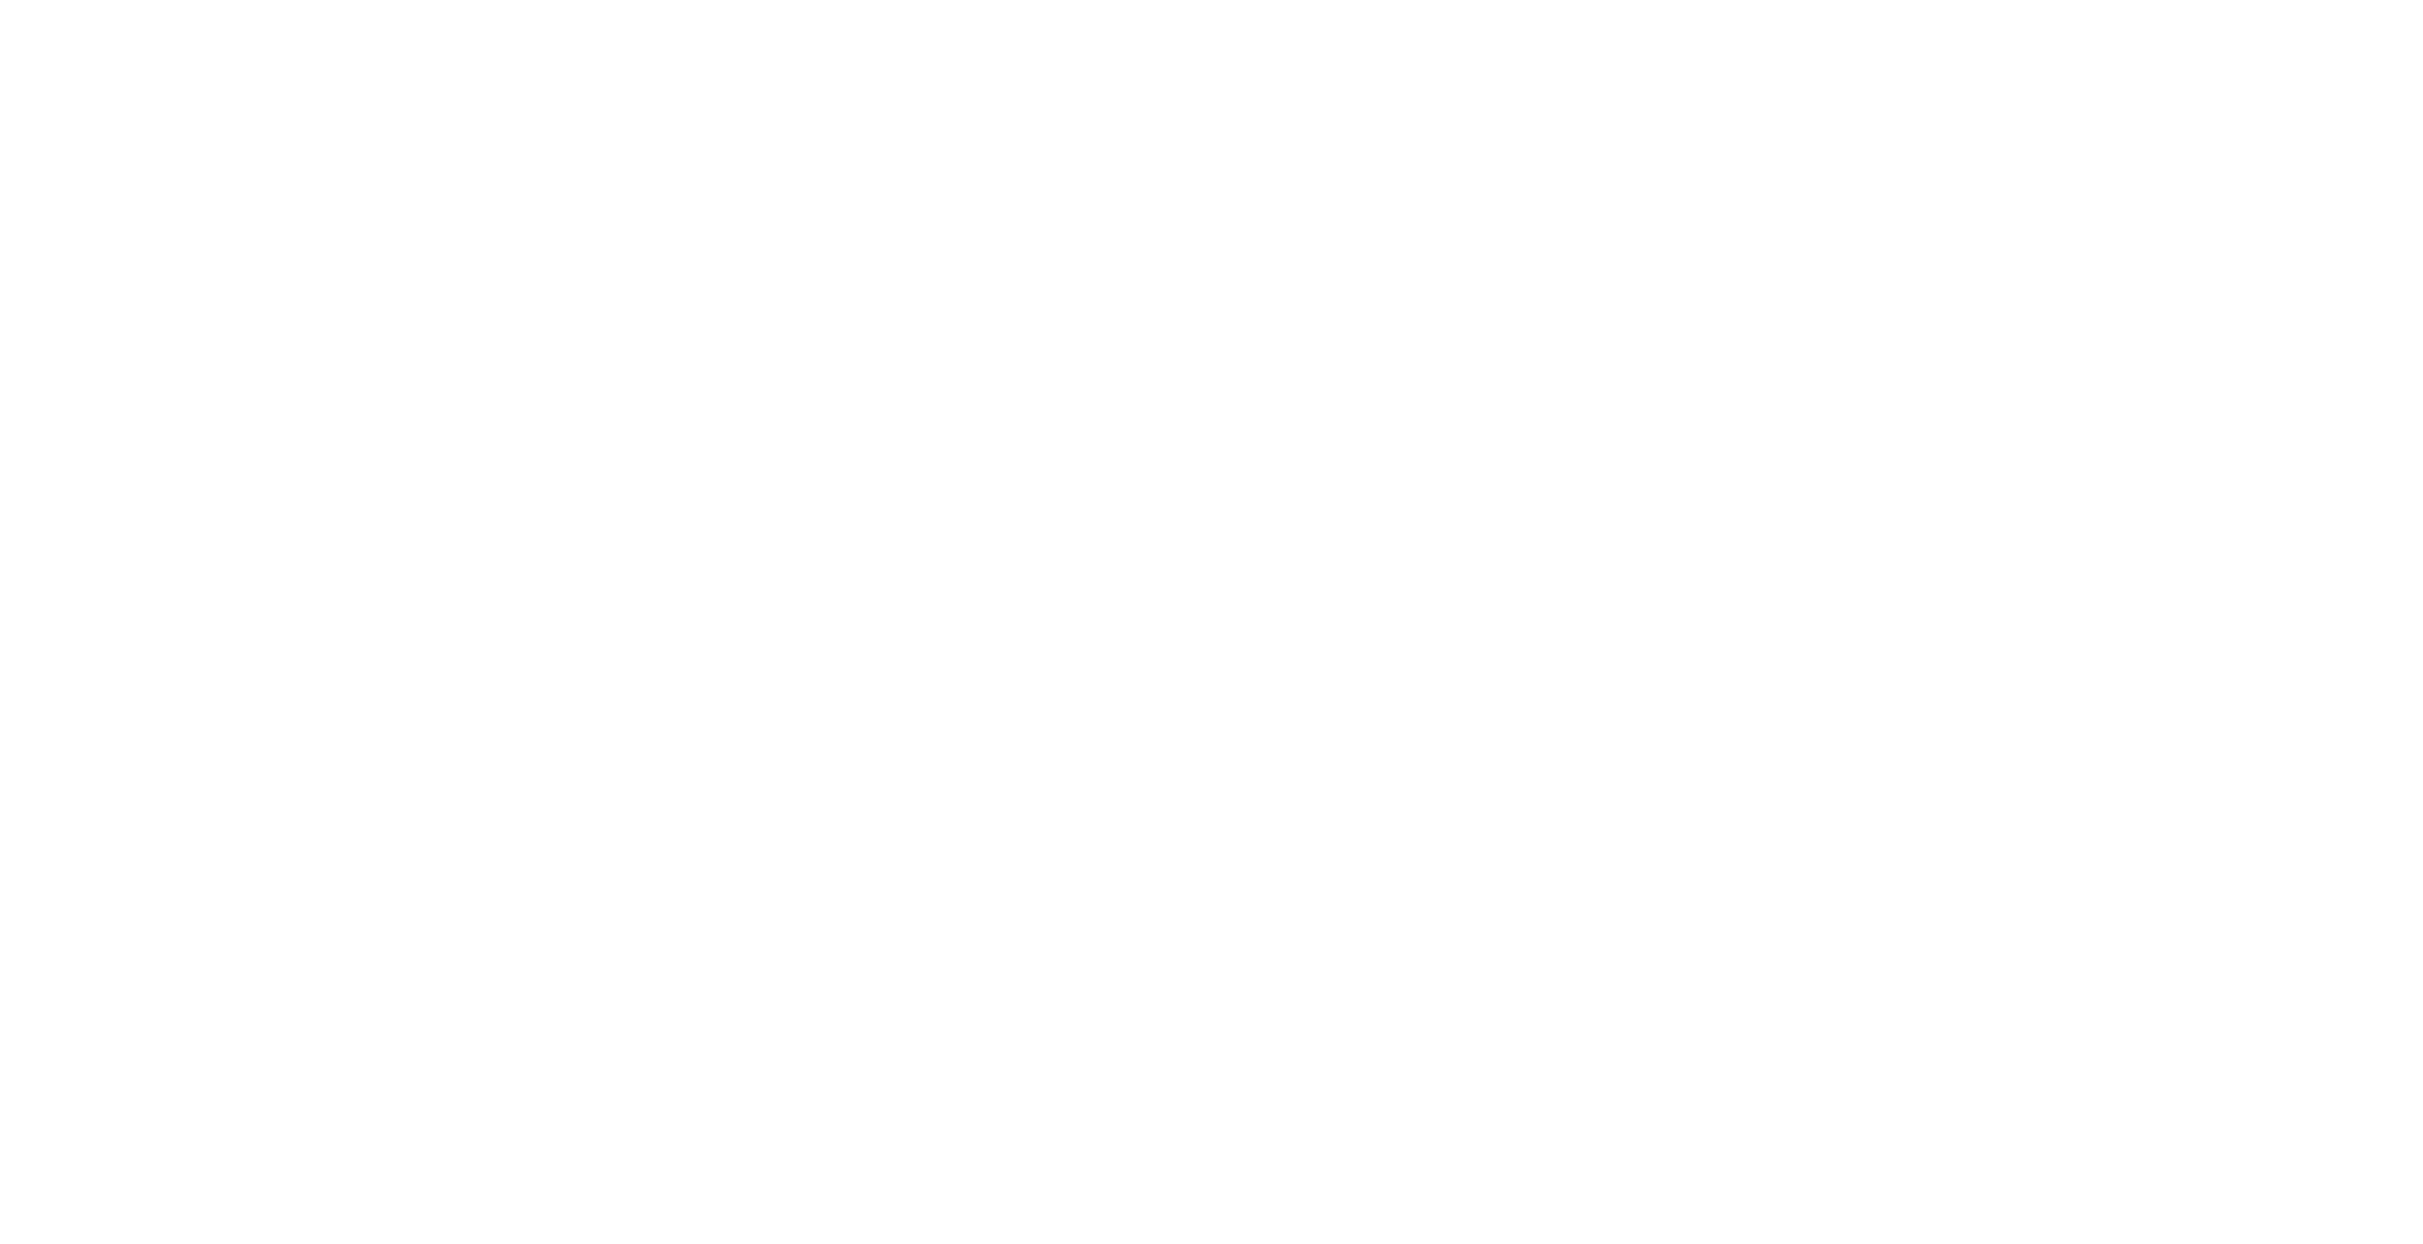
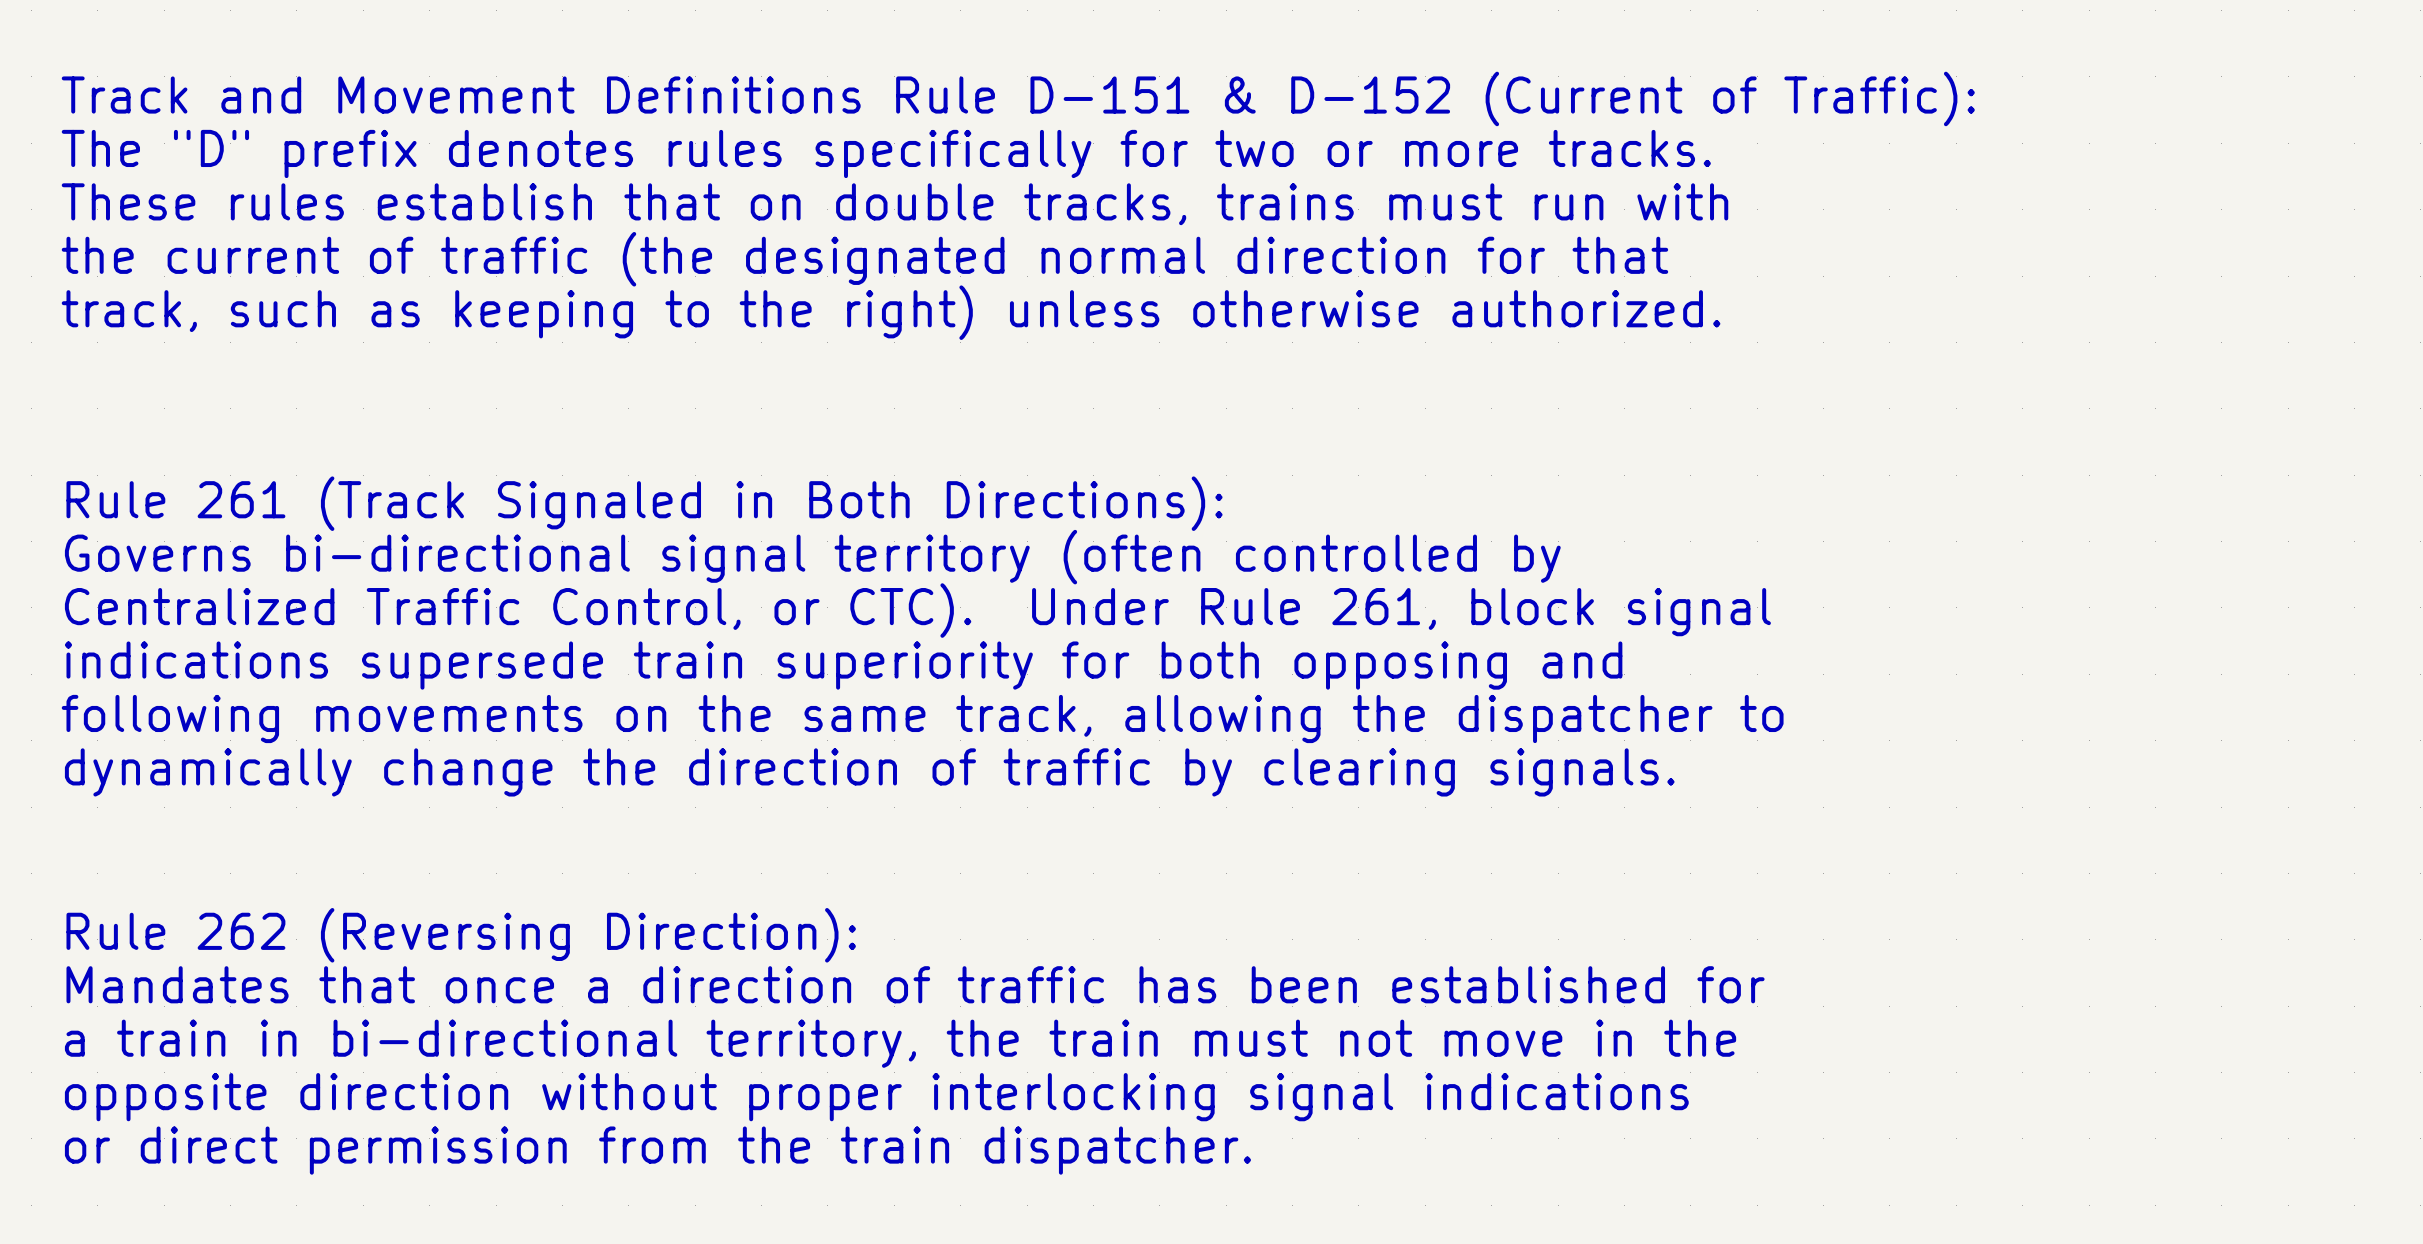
text: none -> Track and Movement Definitions Rule D-151 & D-152 (Current of Traffic): (1018, 98)
text: none -> The "D" prefix denotes rules specifically for two or more tracks. (886, 153)
text: none -> These rules establish that on double tracks, trains must run with (894, 204)
text: none -> the current of traffic (the designated normal direction for that (864, 259)
text: none -> track, such as keeping to the right) unless otherwise authorized. (891, 312)
text: none -> Rule 261 (Track Signaled in Both Directions): (644, 503)
text: none -> Governs bi-directional signal territory (often controlled by (812, 557)
text: none -> Centralized Traffic Control, or CTC). Under Rule 261, block signal (917, 610)
text: none -> indications supersede train superiority for both opposing and (843, 665)
text: none -> following movements on the same track, allowing the dispatcher to (922, 718)
text: none -> dynamically change the direction of traffic by clearing signals. (869, 772)
text: none -> Rule 262 (Reversing Direction): (461, 935)
text: none -> Mandates that once a direction of traffic has been established for (915, 984)
text: none -> a train in bi-directional territory, the train must not move in the (900, 1043)
text: none -> opposite direction without proper interlocking signal indications (876, 1097)
text: none -> or direct permission from the train dispatcher. (657, 1150)

